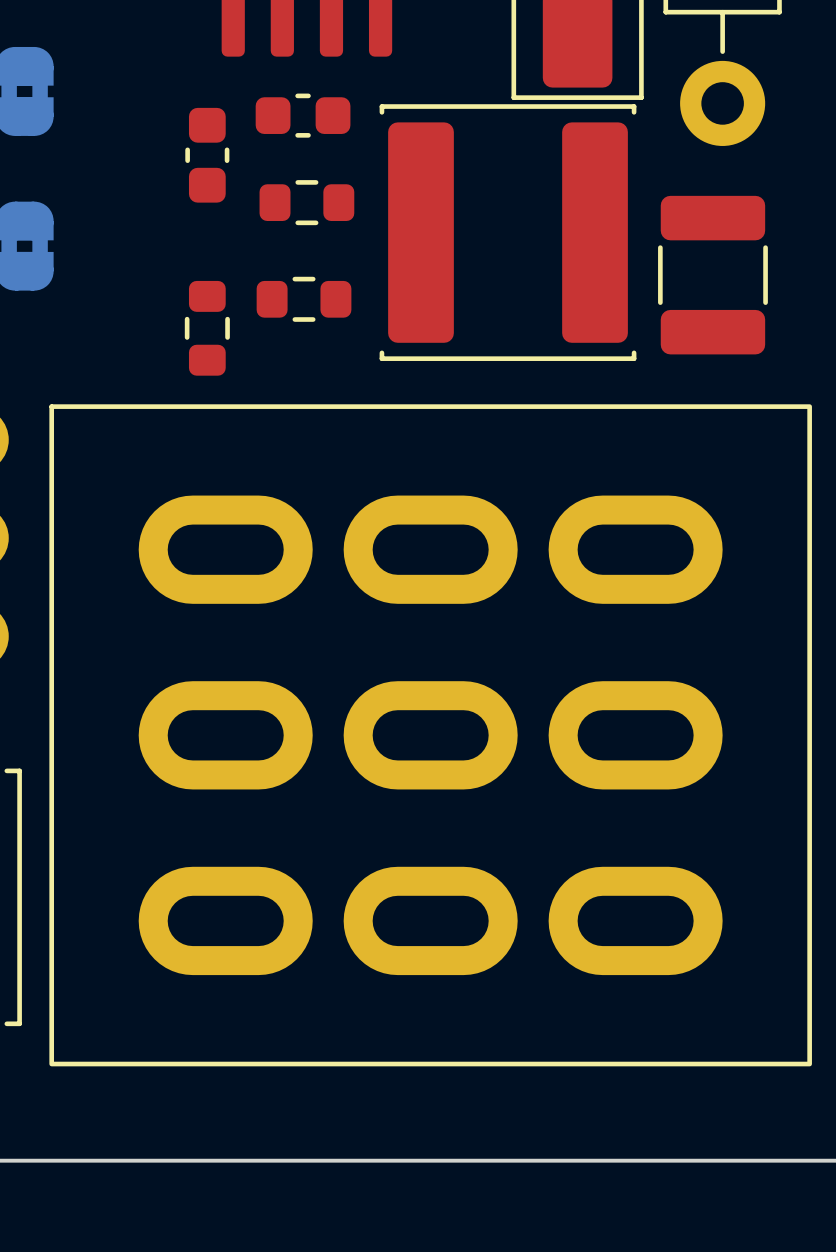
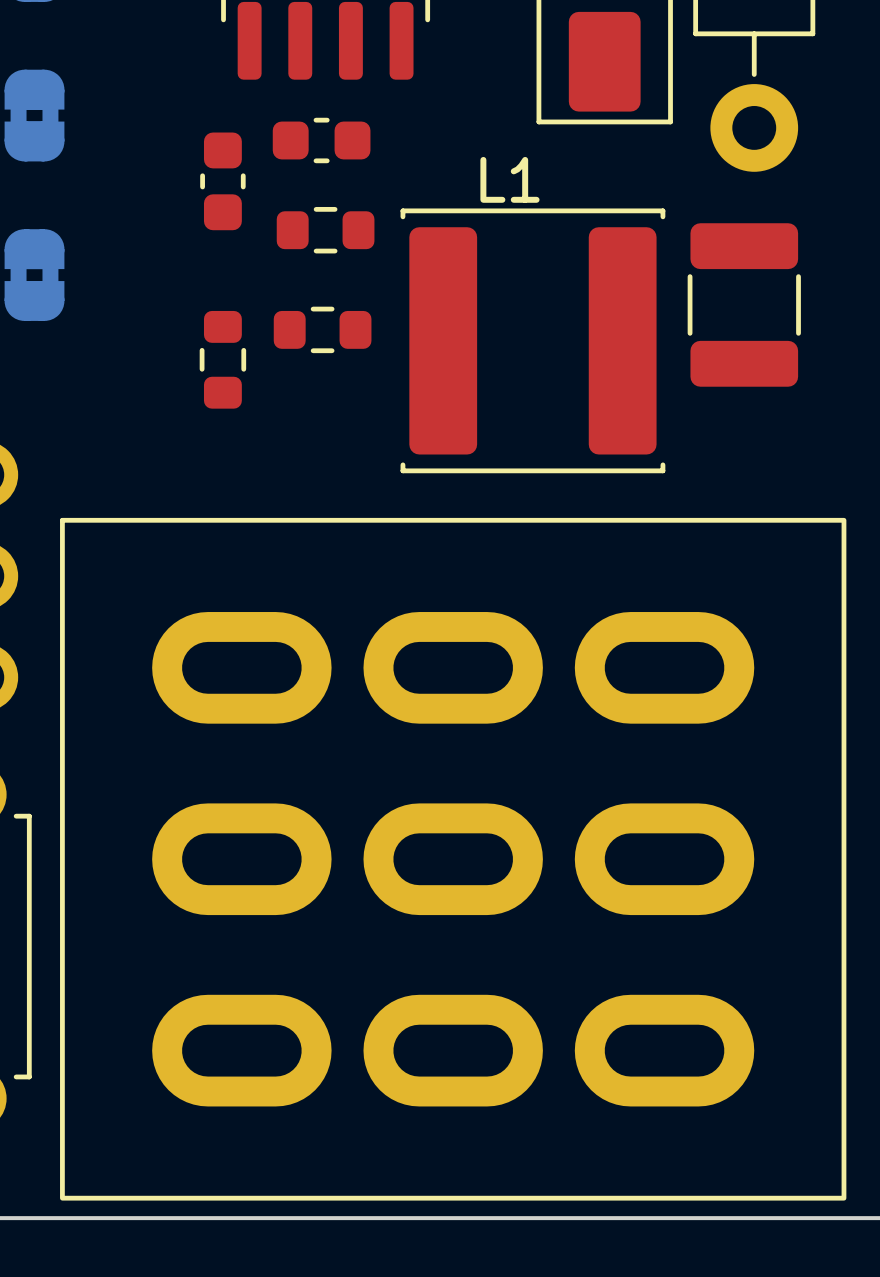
part: (508, 232) -> none
L1: none -> (532, 340)
part position: (430, 735) -> (453, 859)

